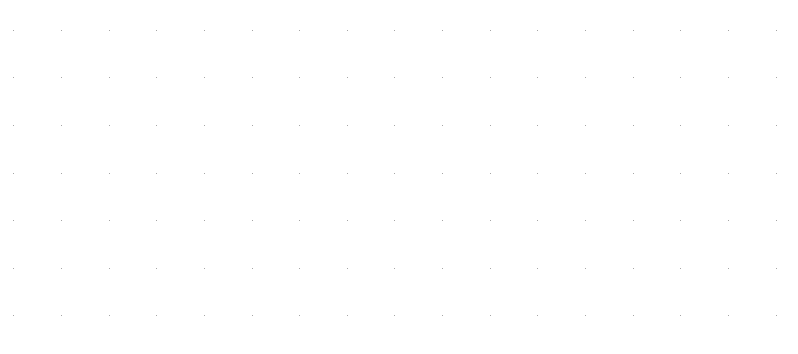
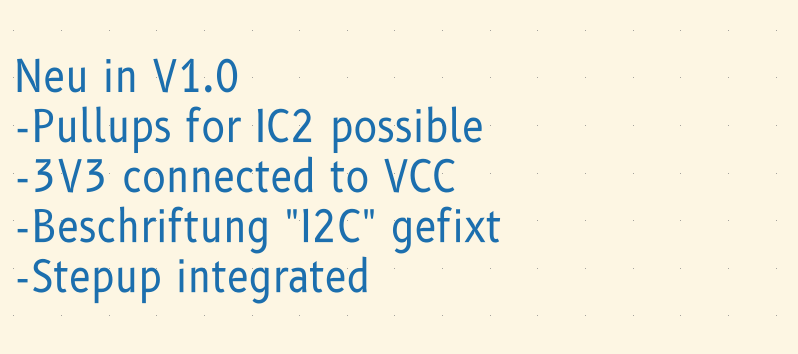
text: none -> Neu in V1.0 (127, 75)
text: none -> -Pullups for IC2 possible (249, 129)
text: none -> -3V3 connected to VCC (236, 174)
text: none -> -Beschriftung "I2C" gefixt (258, 230)
text: none -> -Stepup integrated (192, 280)

